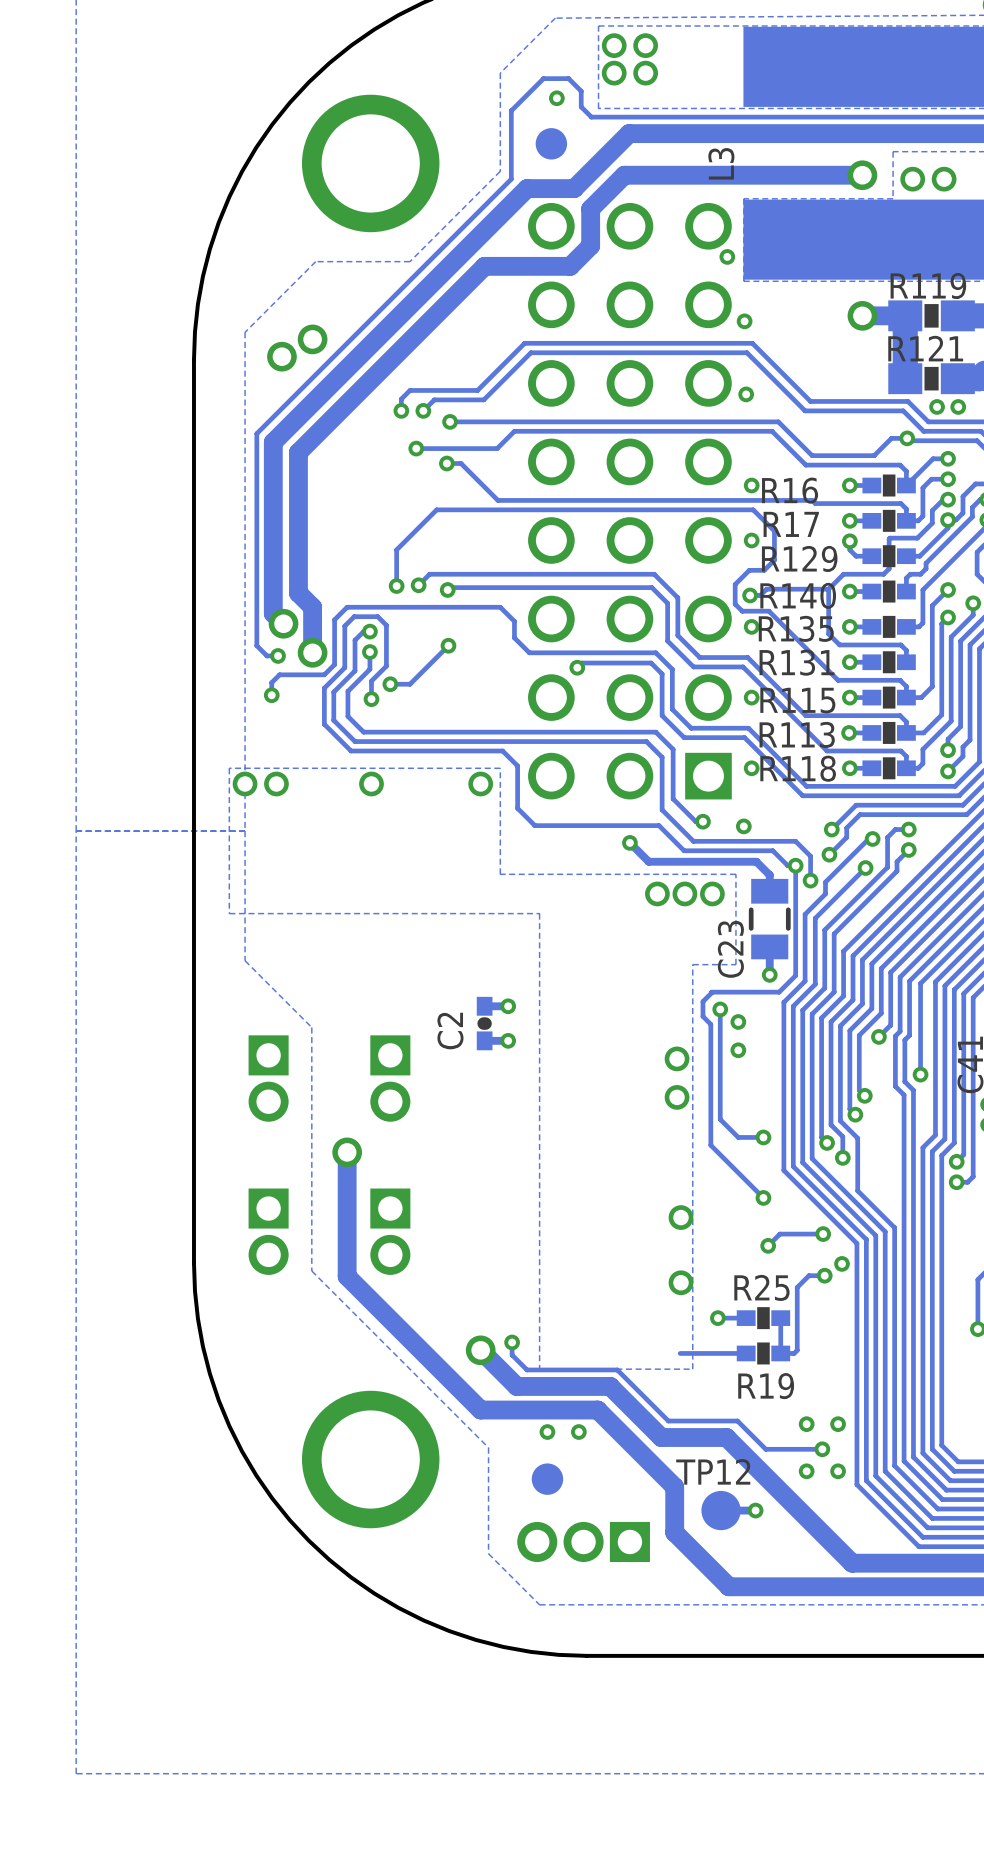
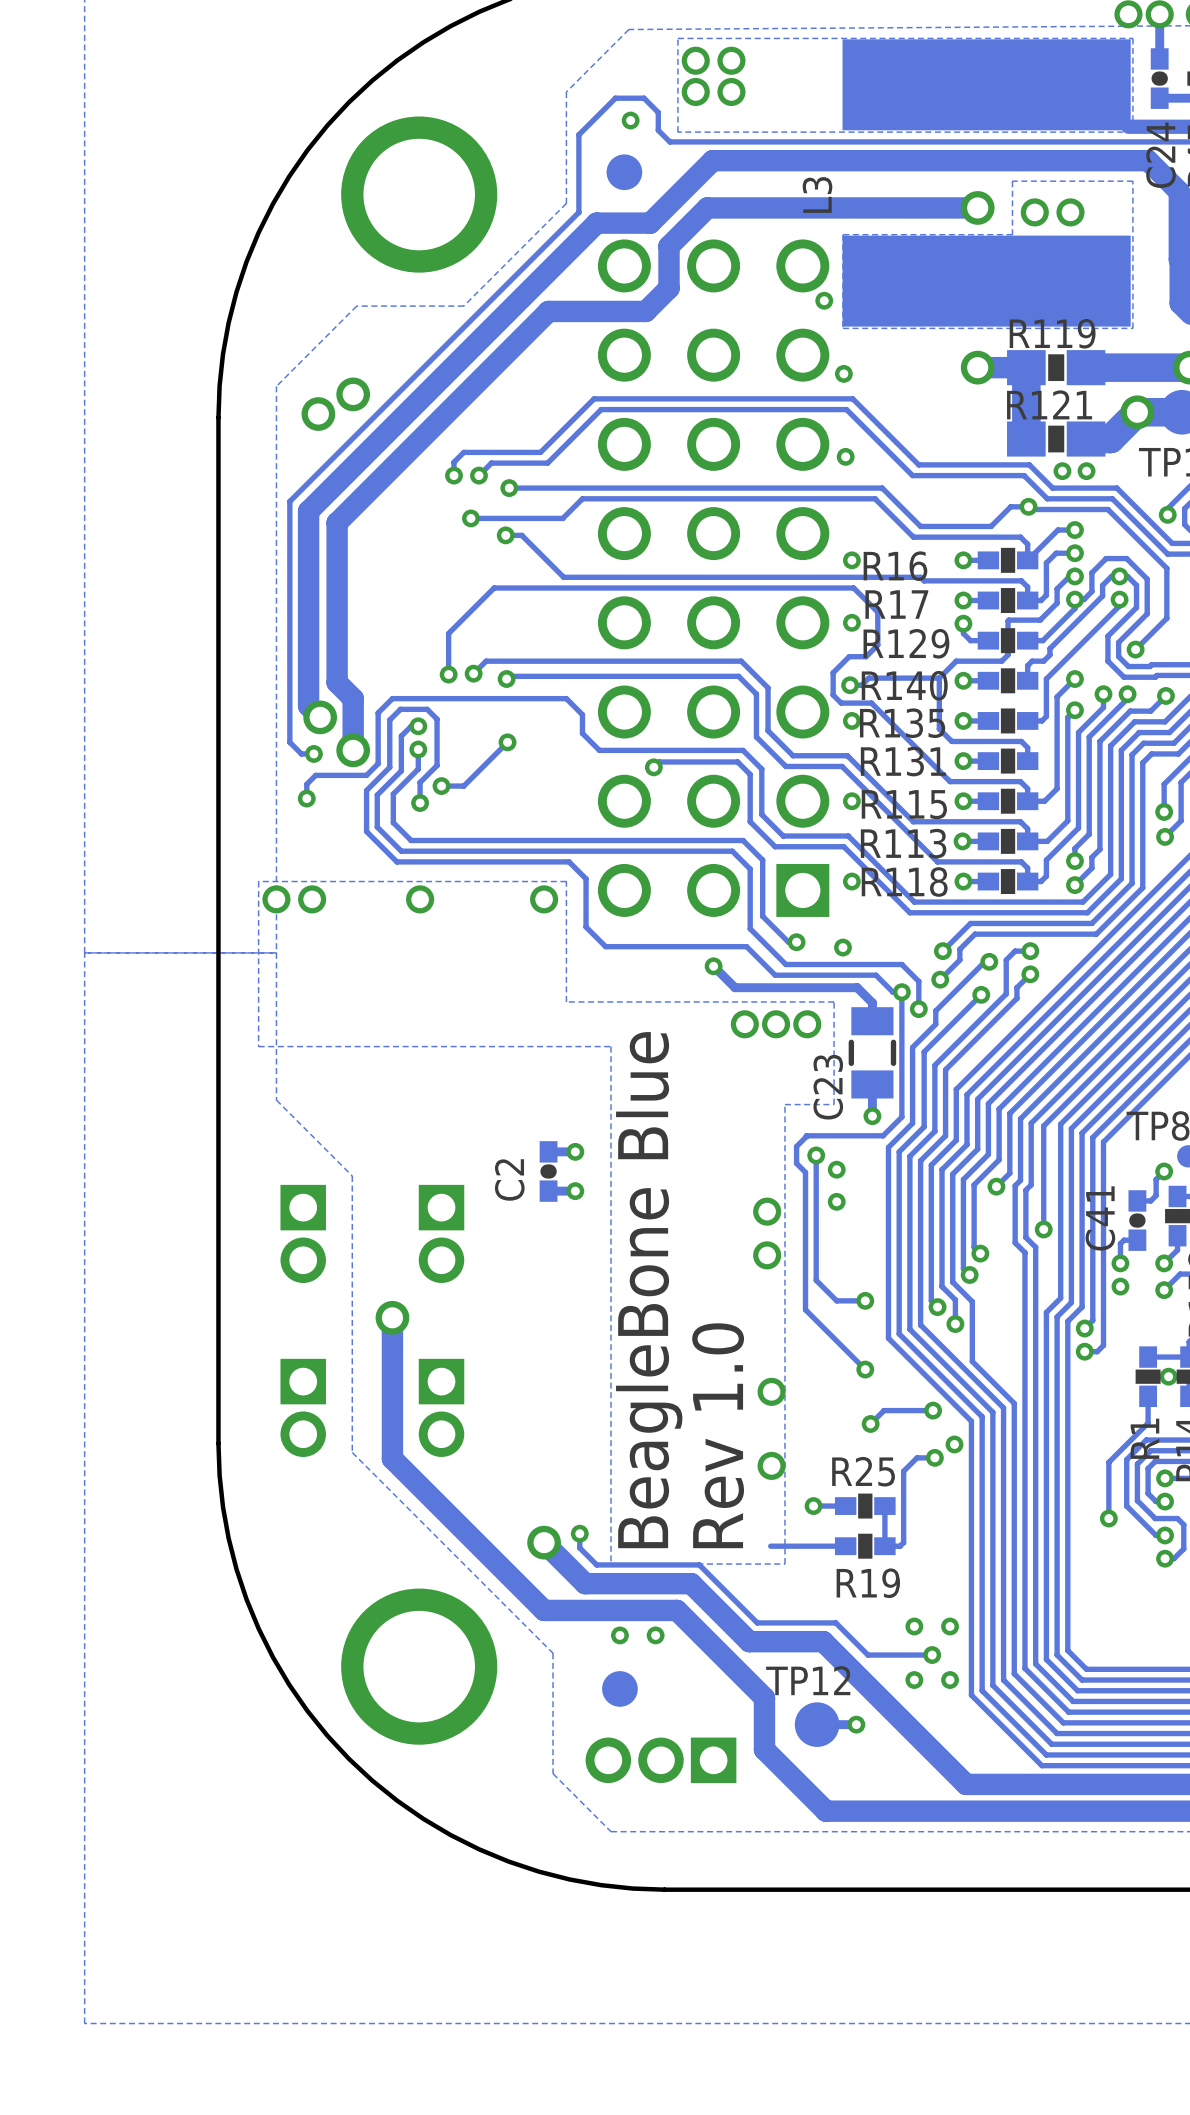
text: none -> BeagleBone Blue (649, 1290)
text: none -> Rev 1.0 (718, 1435)

